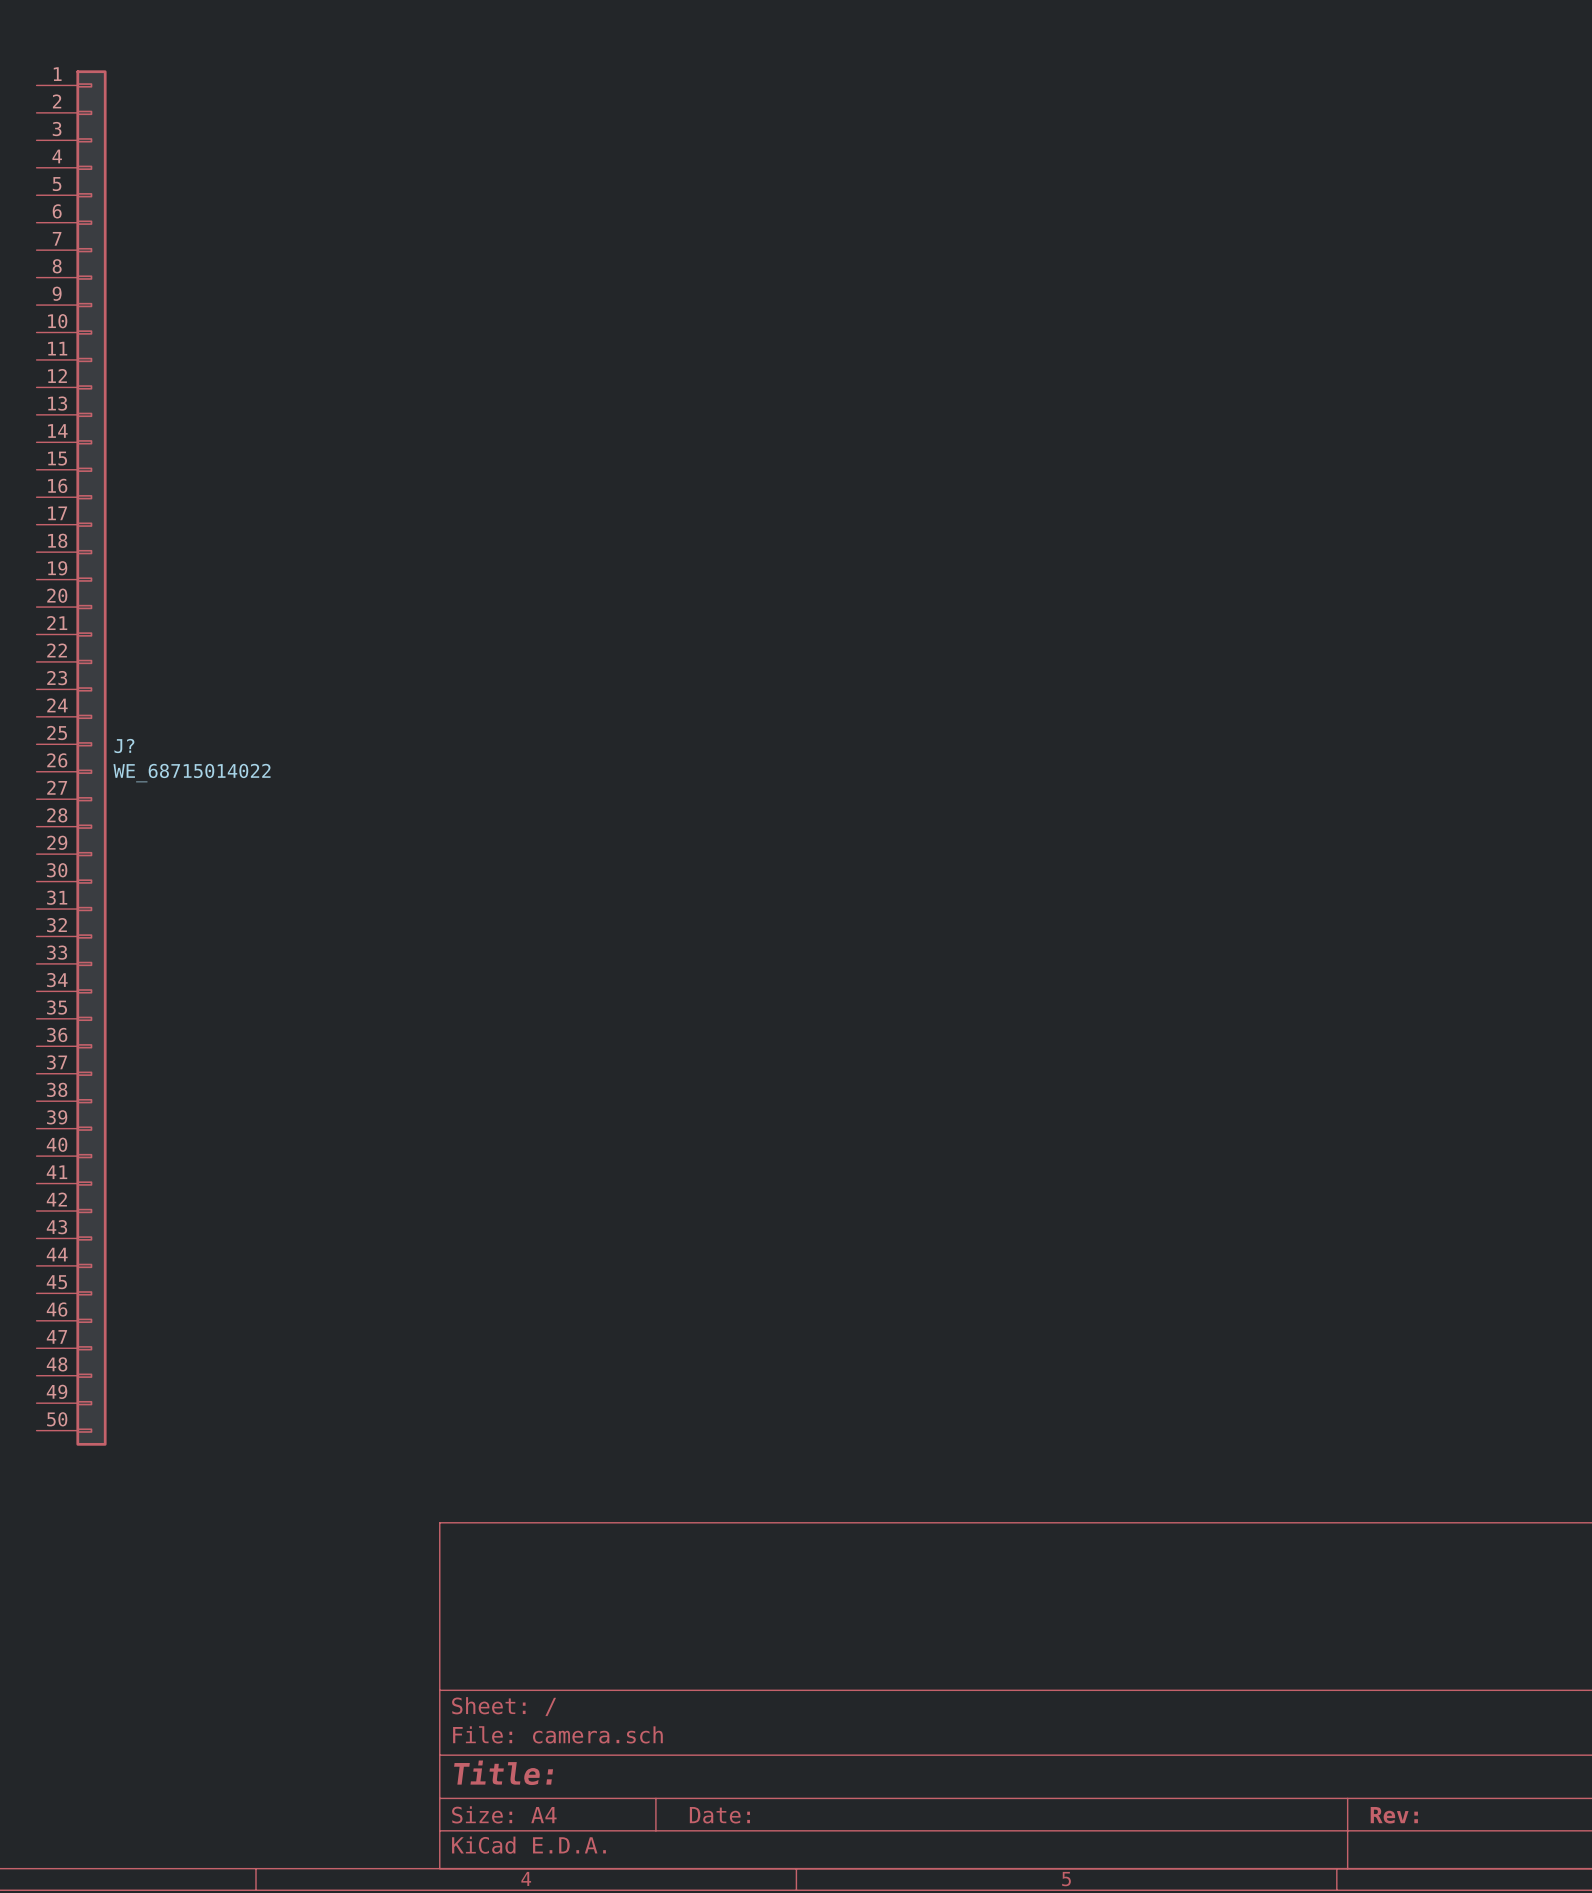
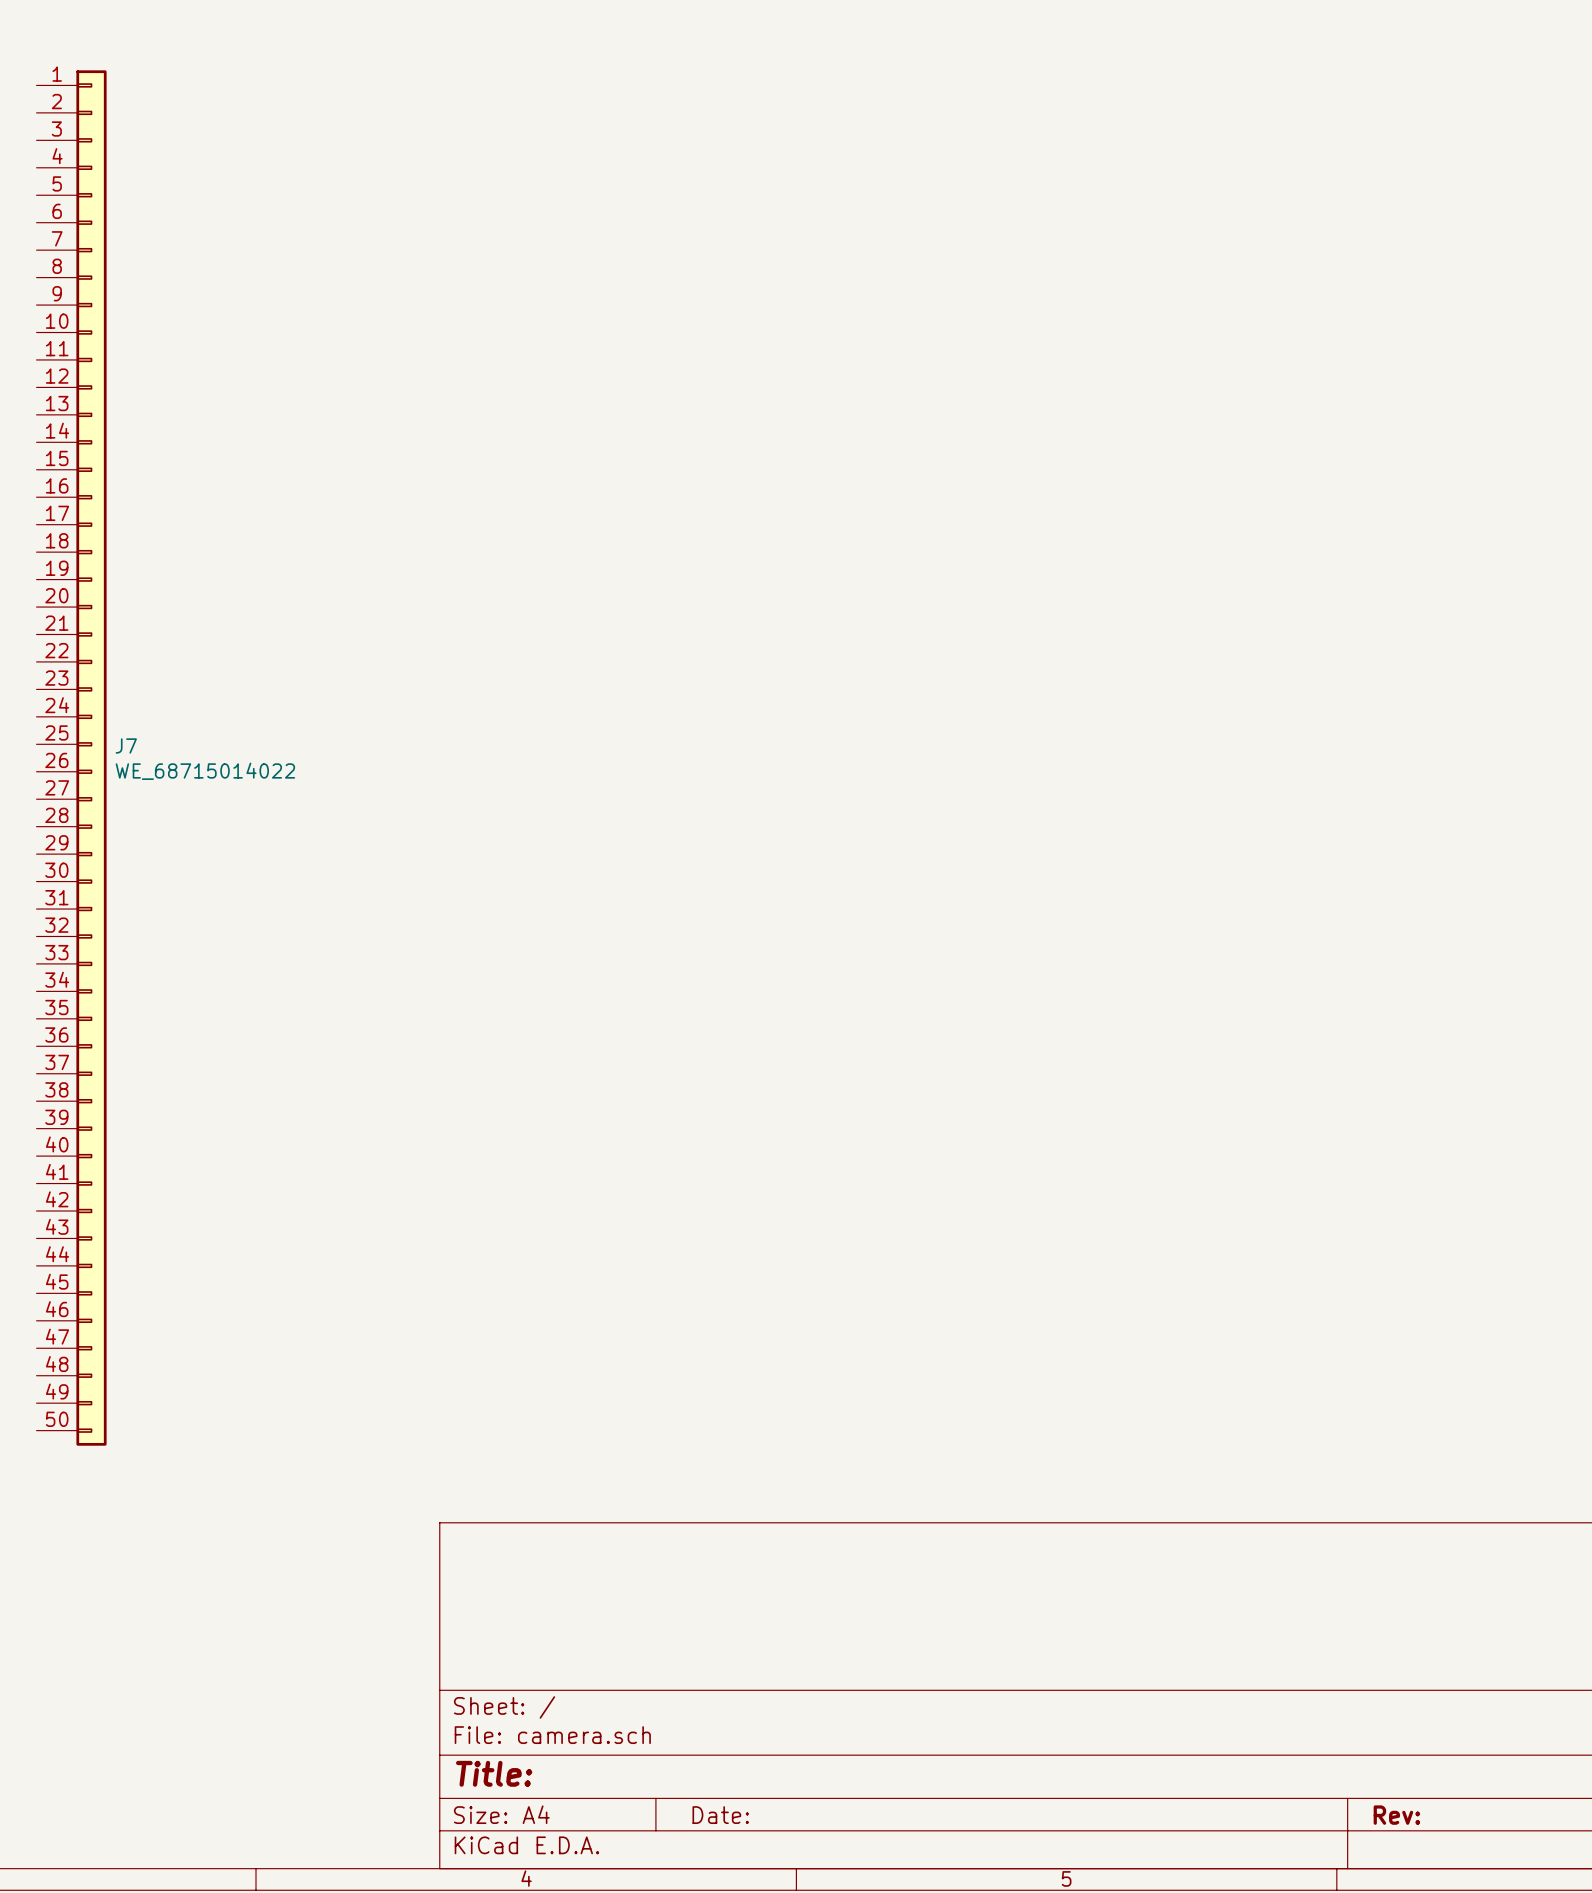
J? name: J? (124, 745) -> J7 (126, 745)

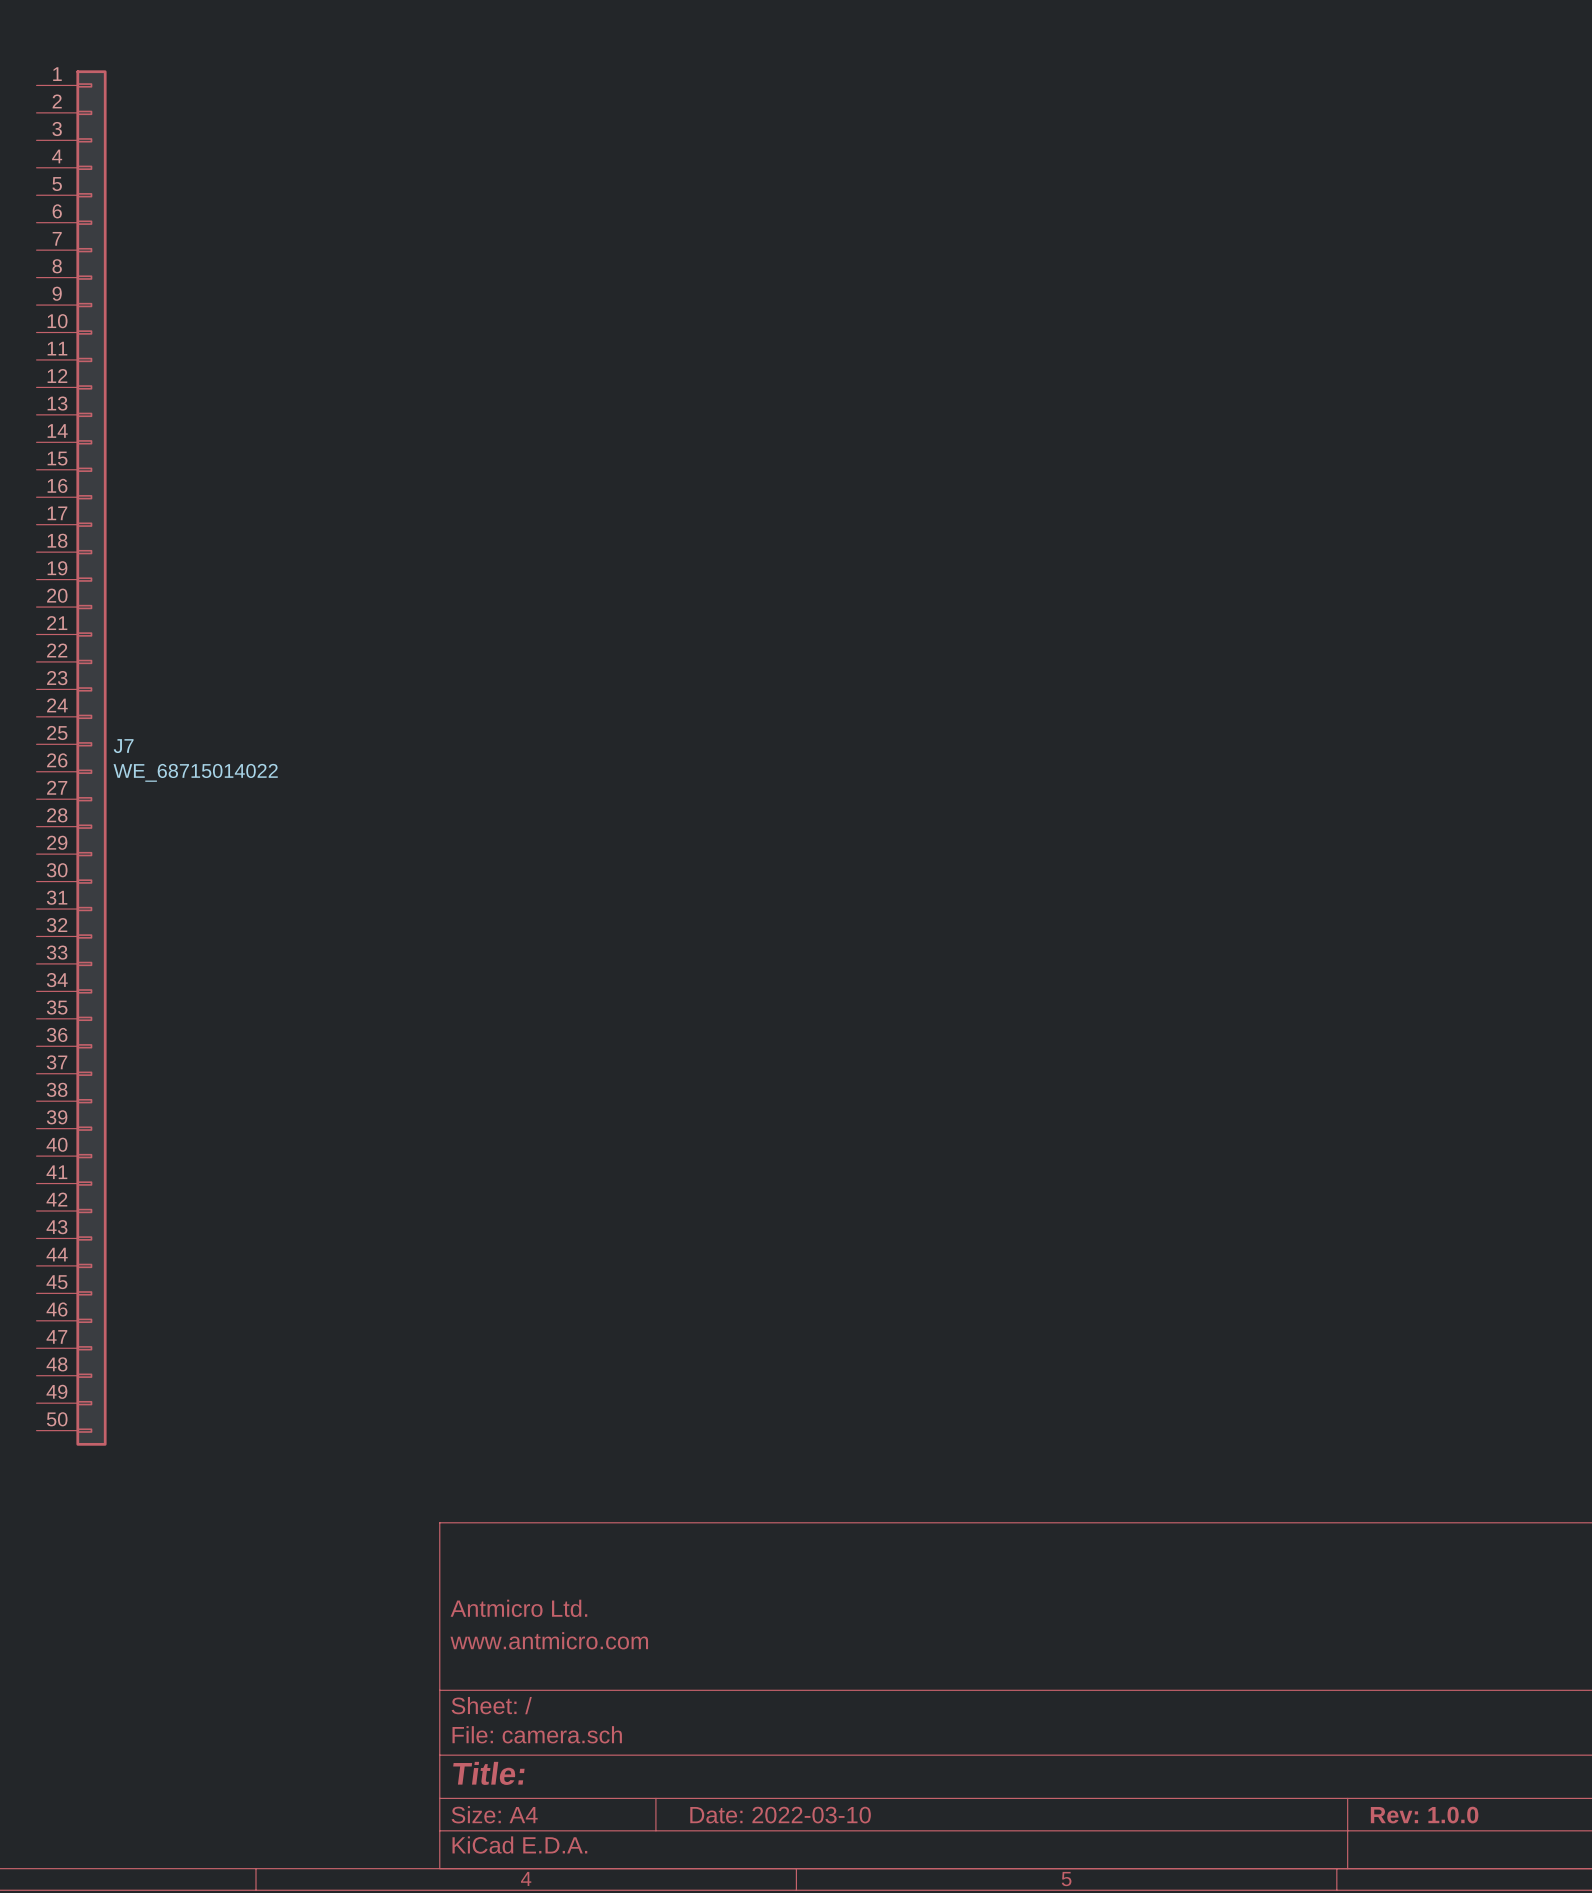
title block: none -> Antmicro Ltd. (518, 1608)
title block: none -> www.antmicro.com (549, 1640)
title block: Date: (720, 1815) -> Date: 2022-03-10 (780, 1815)
title block: Rev: (1396, 1815) -> Rev: 1.0.0 (1424, 1815)

